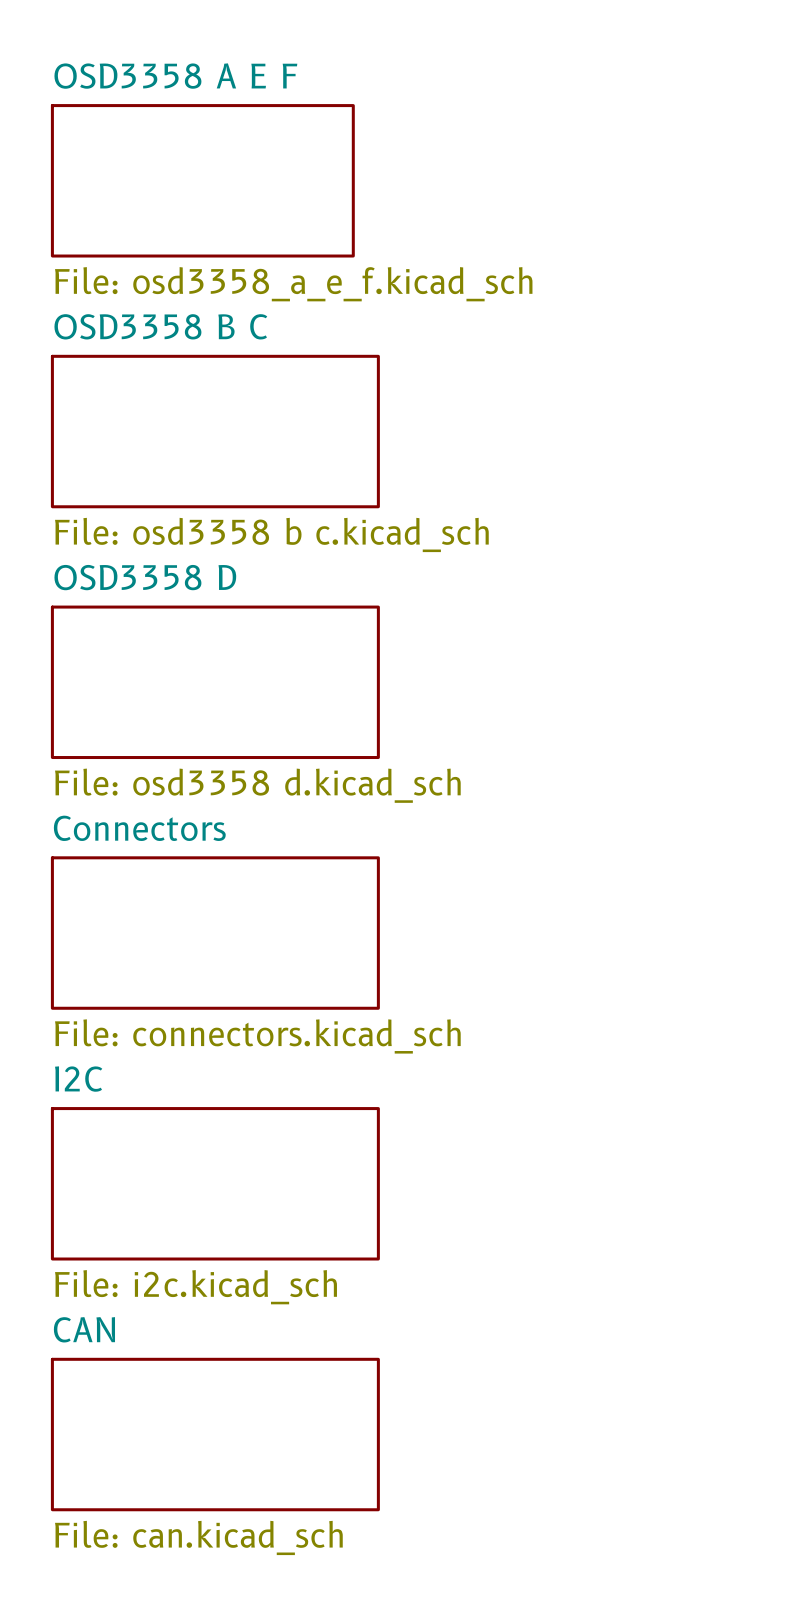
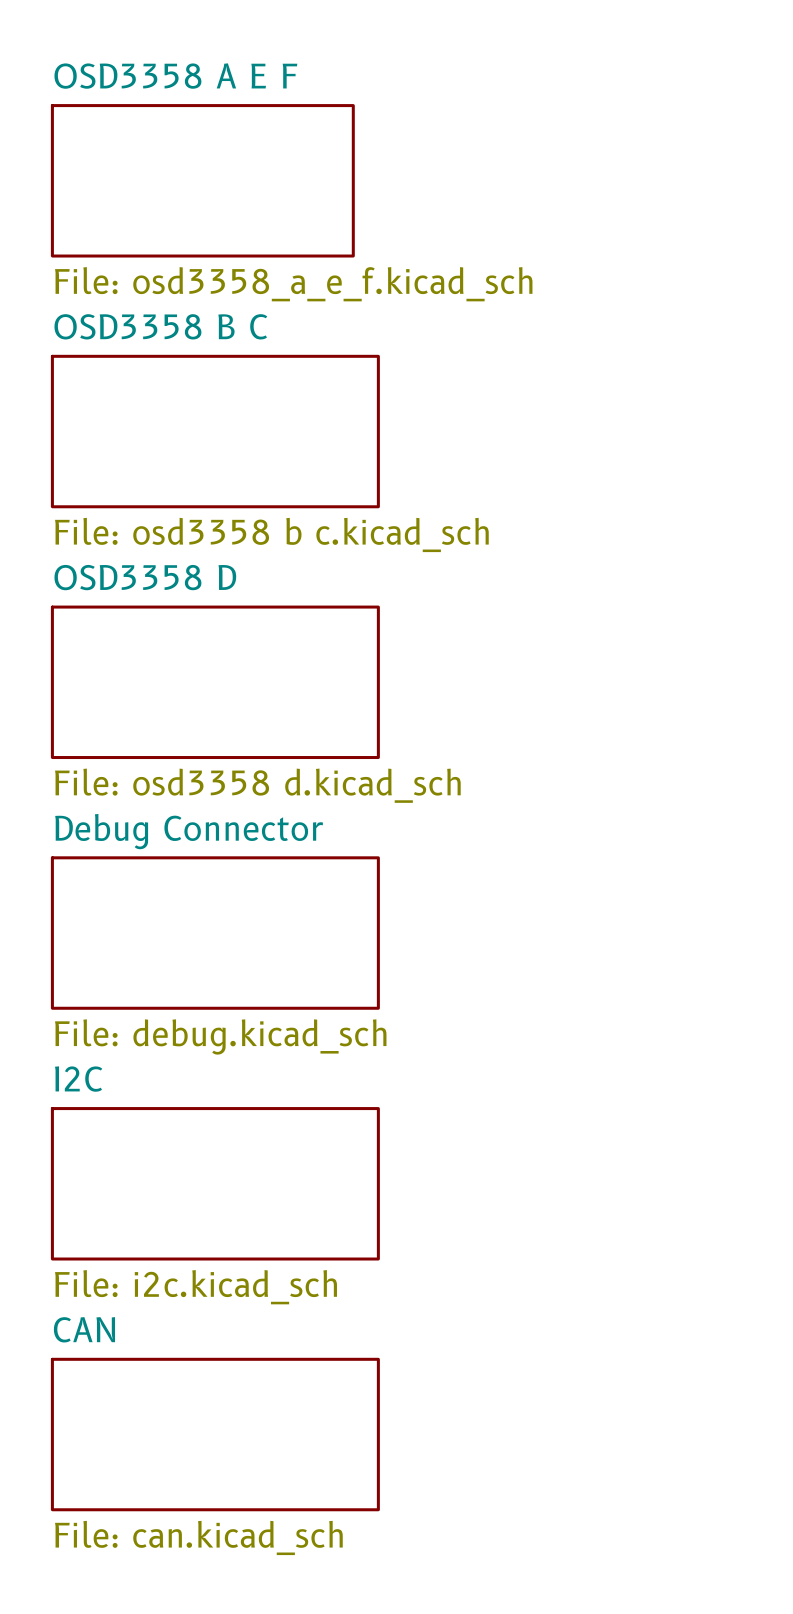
sheet Connectors name: Connectors (139, 828) -> Debug Connector (189, 831)
sheet Connectors value: File: connectors.kicad_sch (257, 1036) -> File: debug.kicad_sch (220, 1036)

